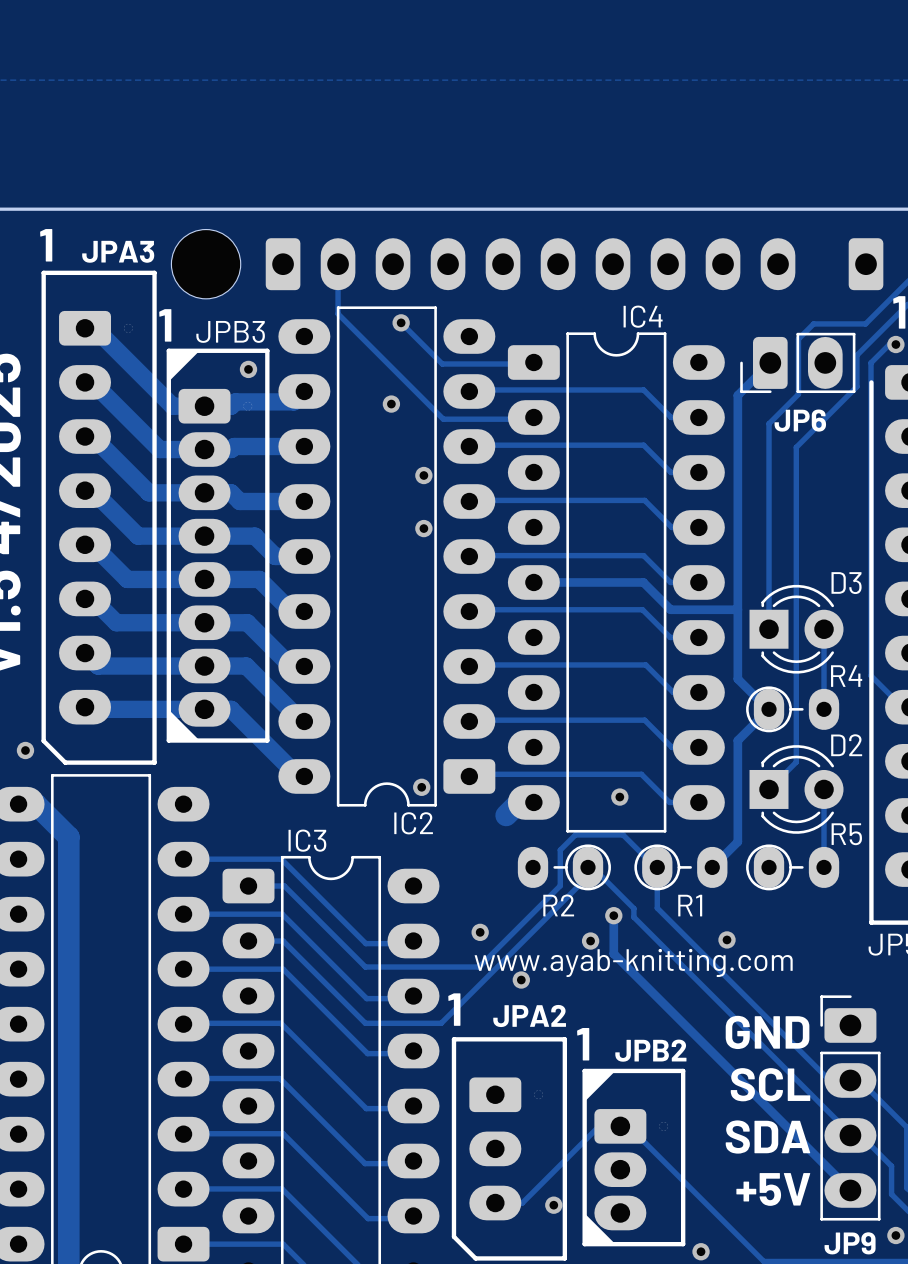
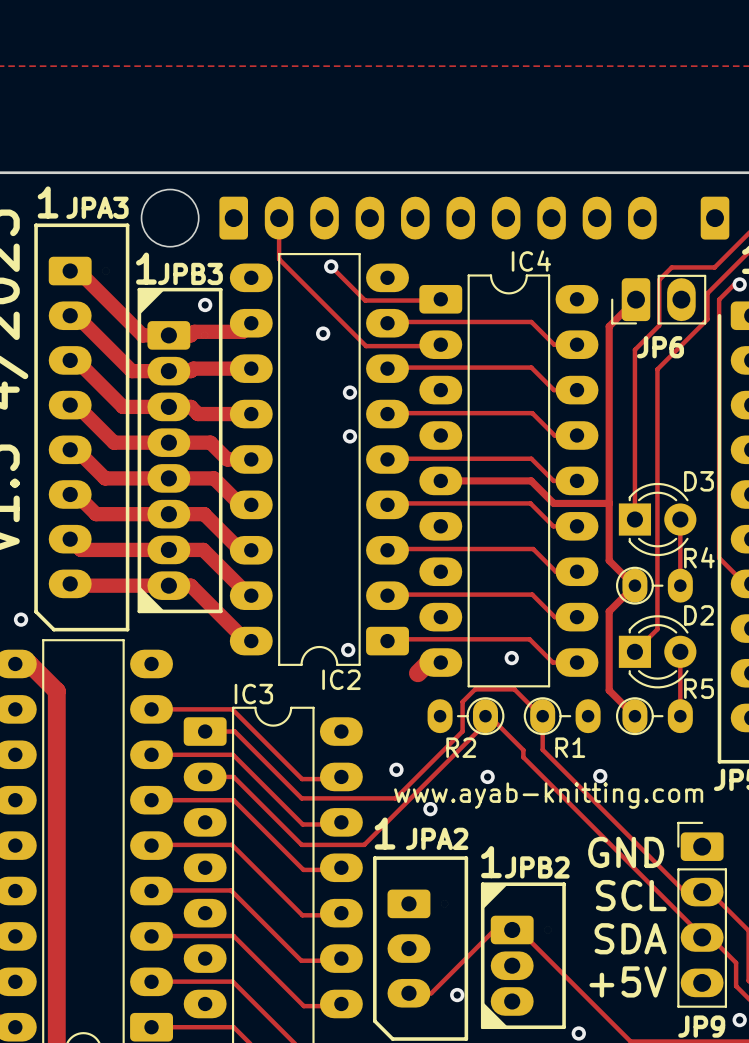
track: (737, 836) (737, 841) (712, 867) -> (609, 690) (634, 716)
track: (613, 915) (613, 953) (850, 1190) -> none
via: (613, 915) -> none

